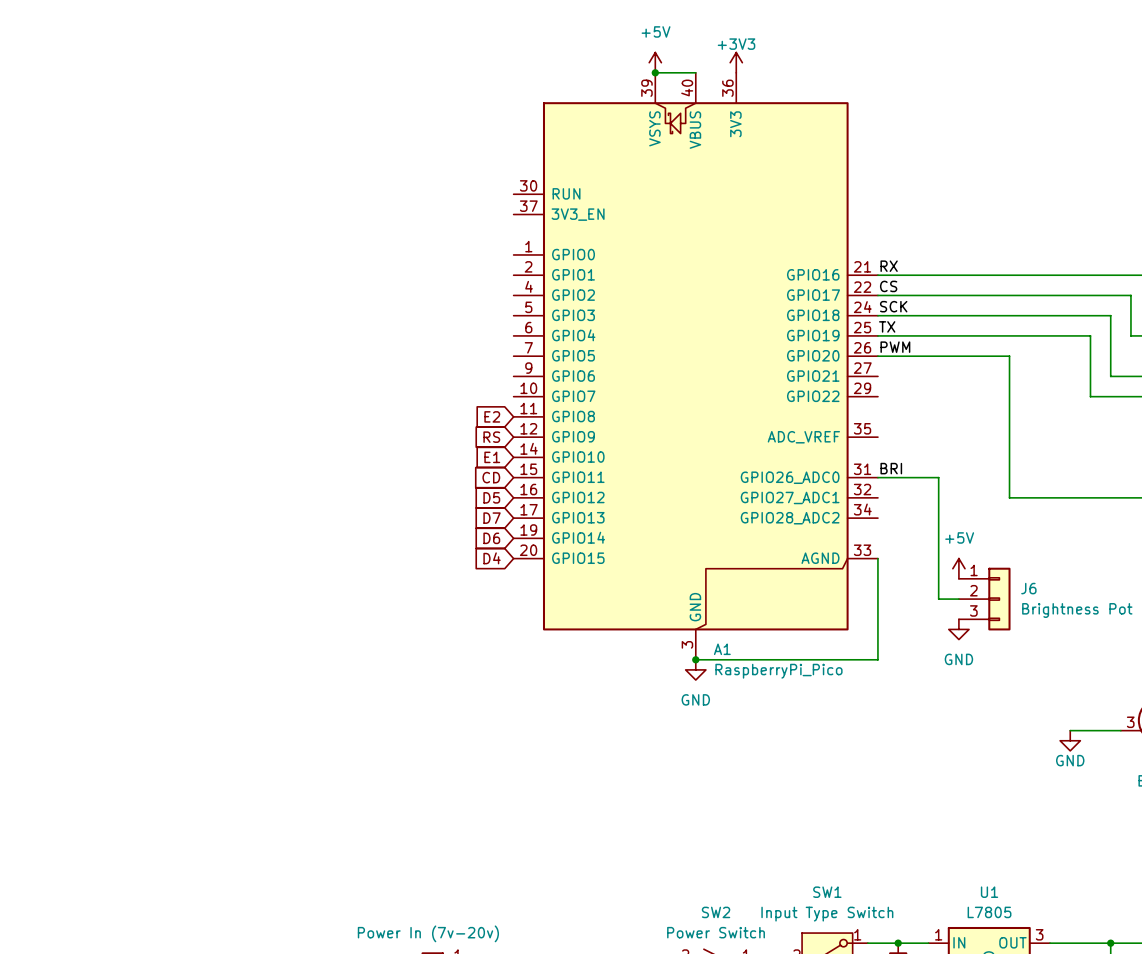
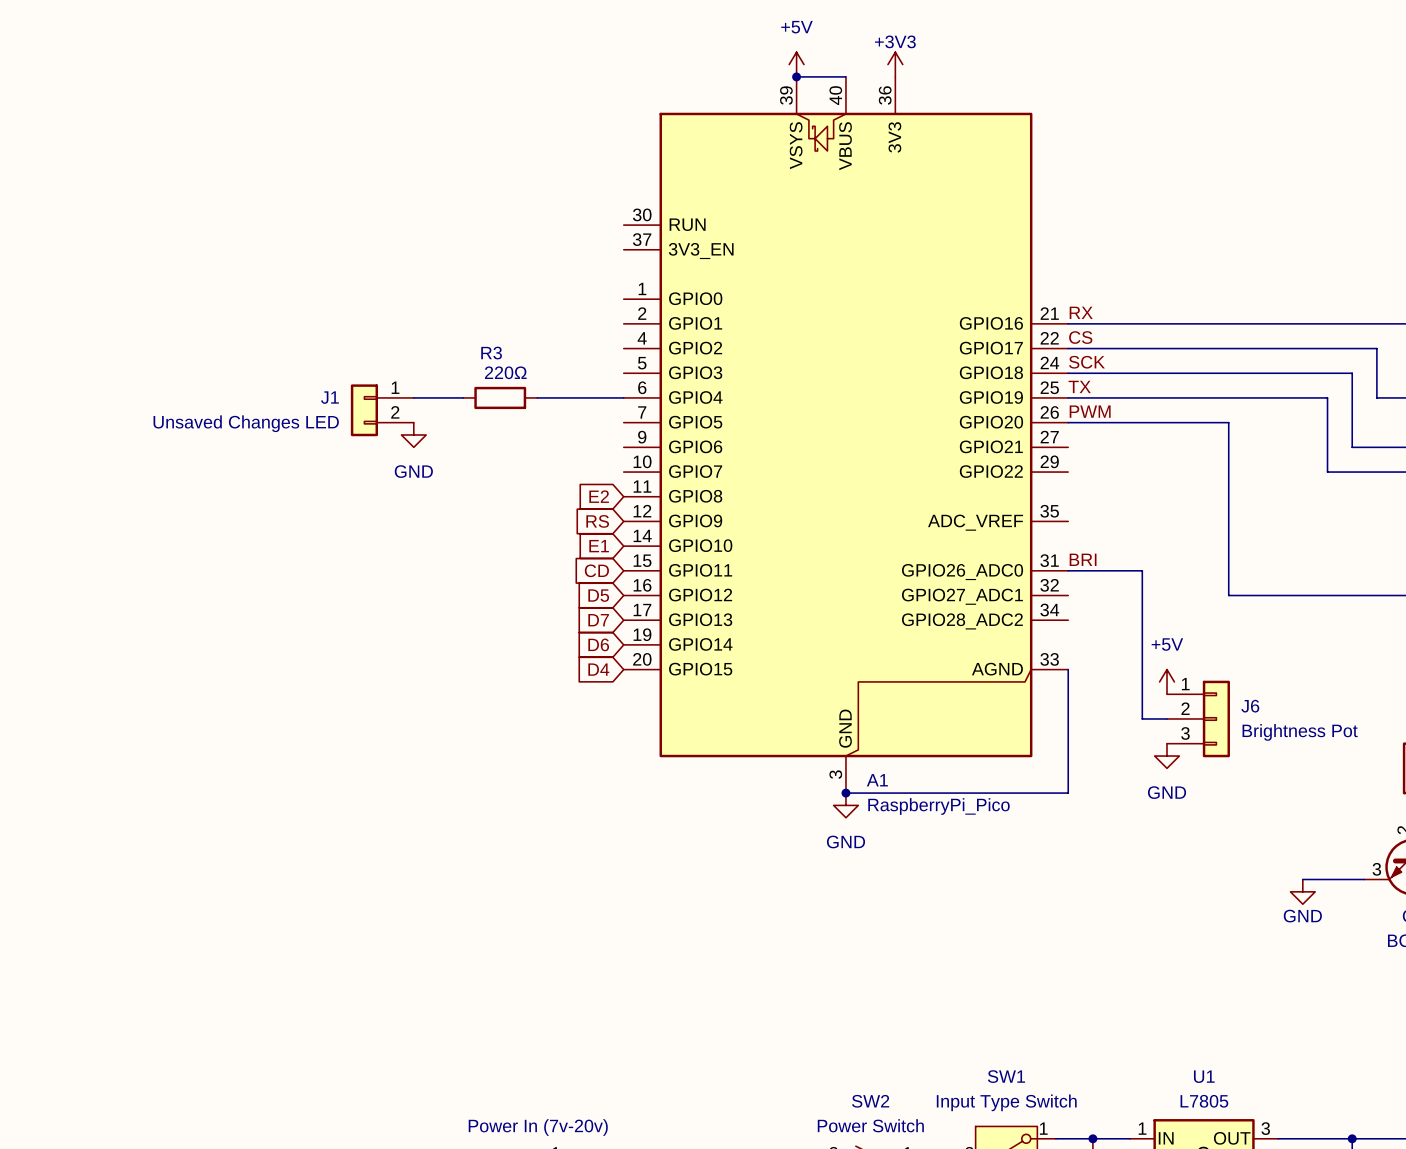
wire: none -> (413, 397) (463, 397)
R3: none -> 220Ω (500, 397)
wire: none -> (537, 397) (623, 397)
J1: none -> Unsaved Changes LED (382, 410)
power symbol: none -> GND (413, 434)

